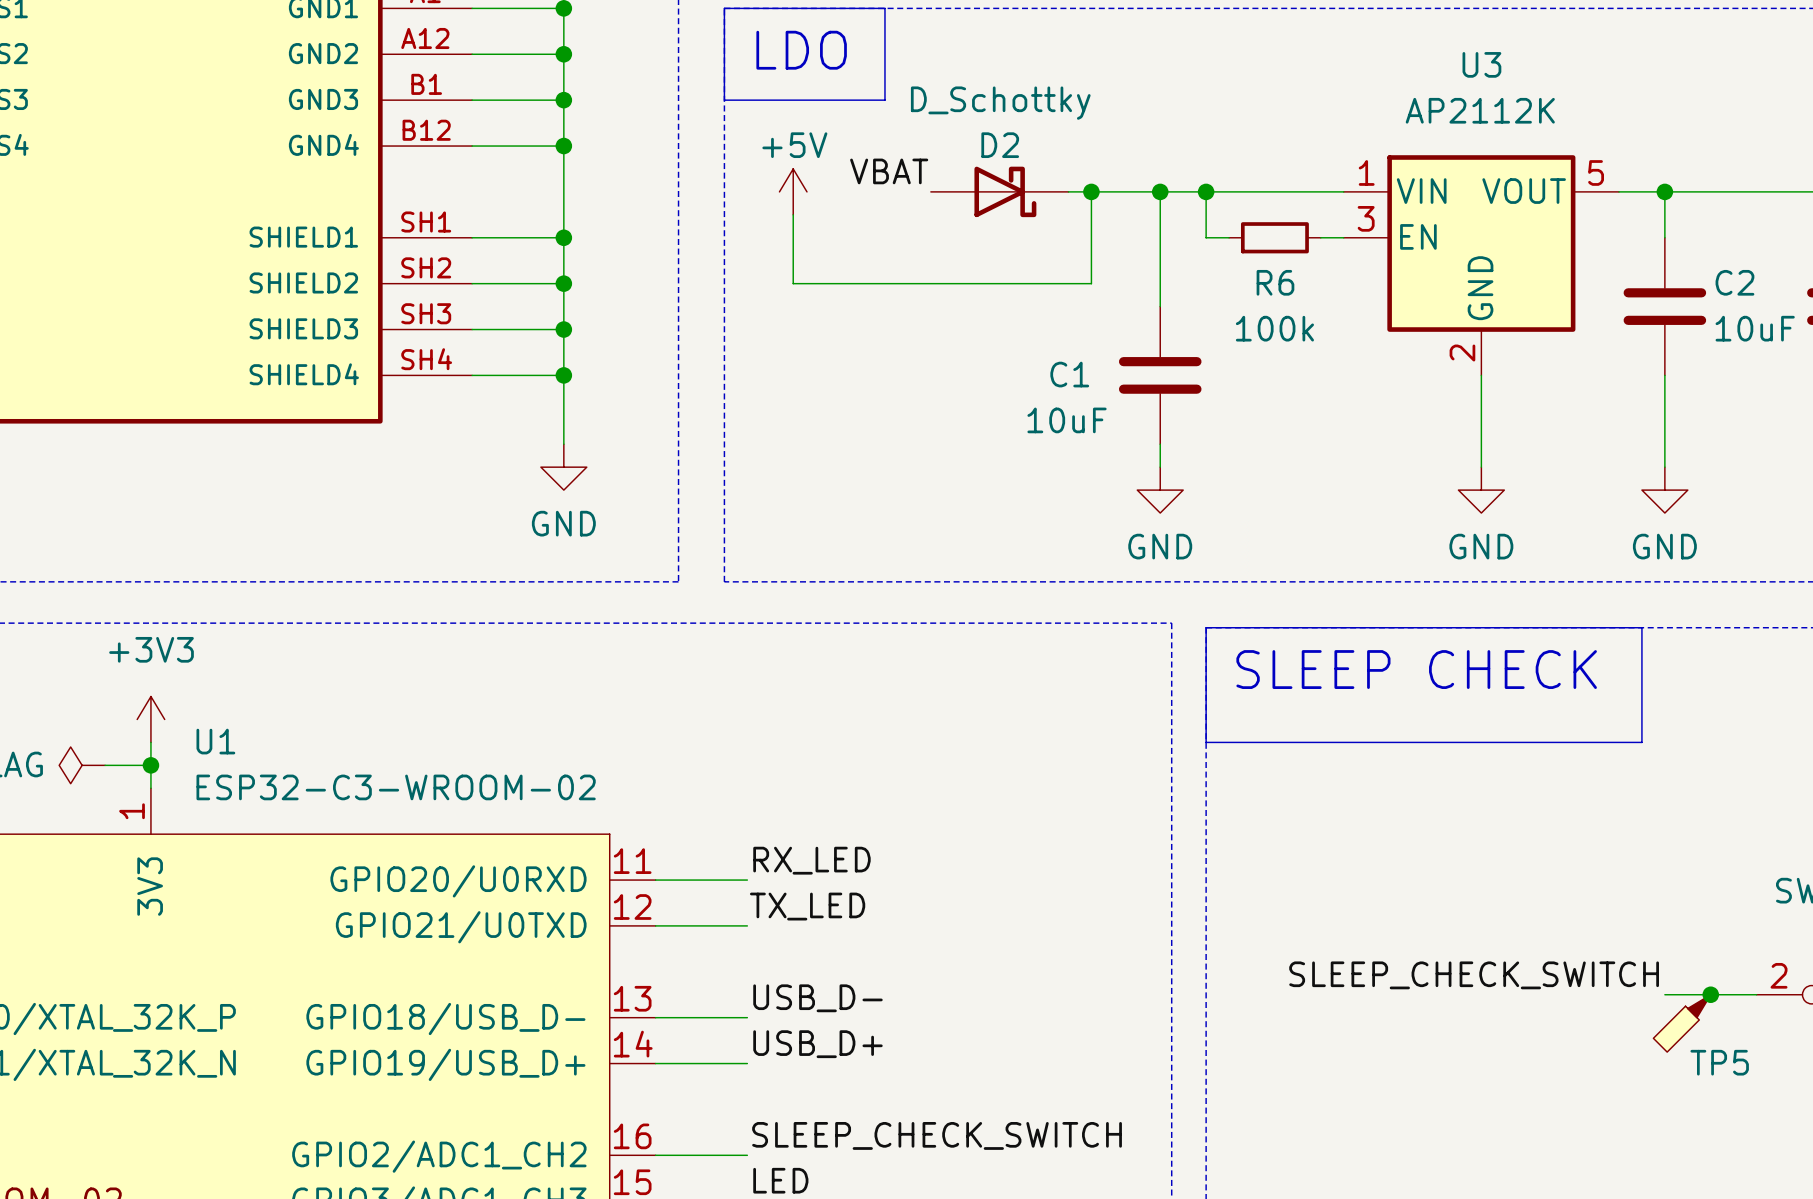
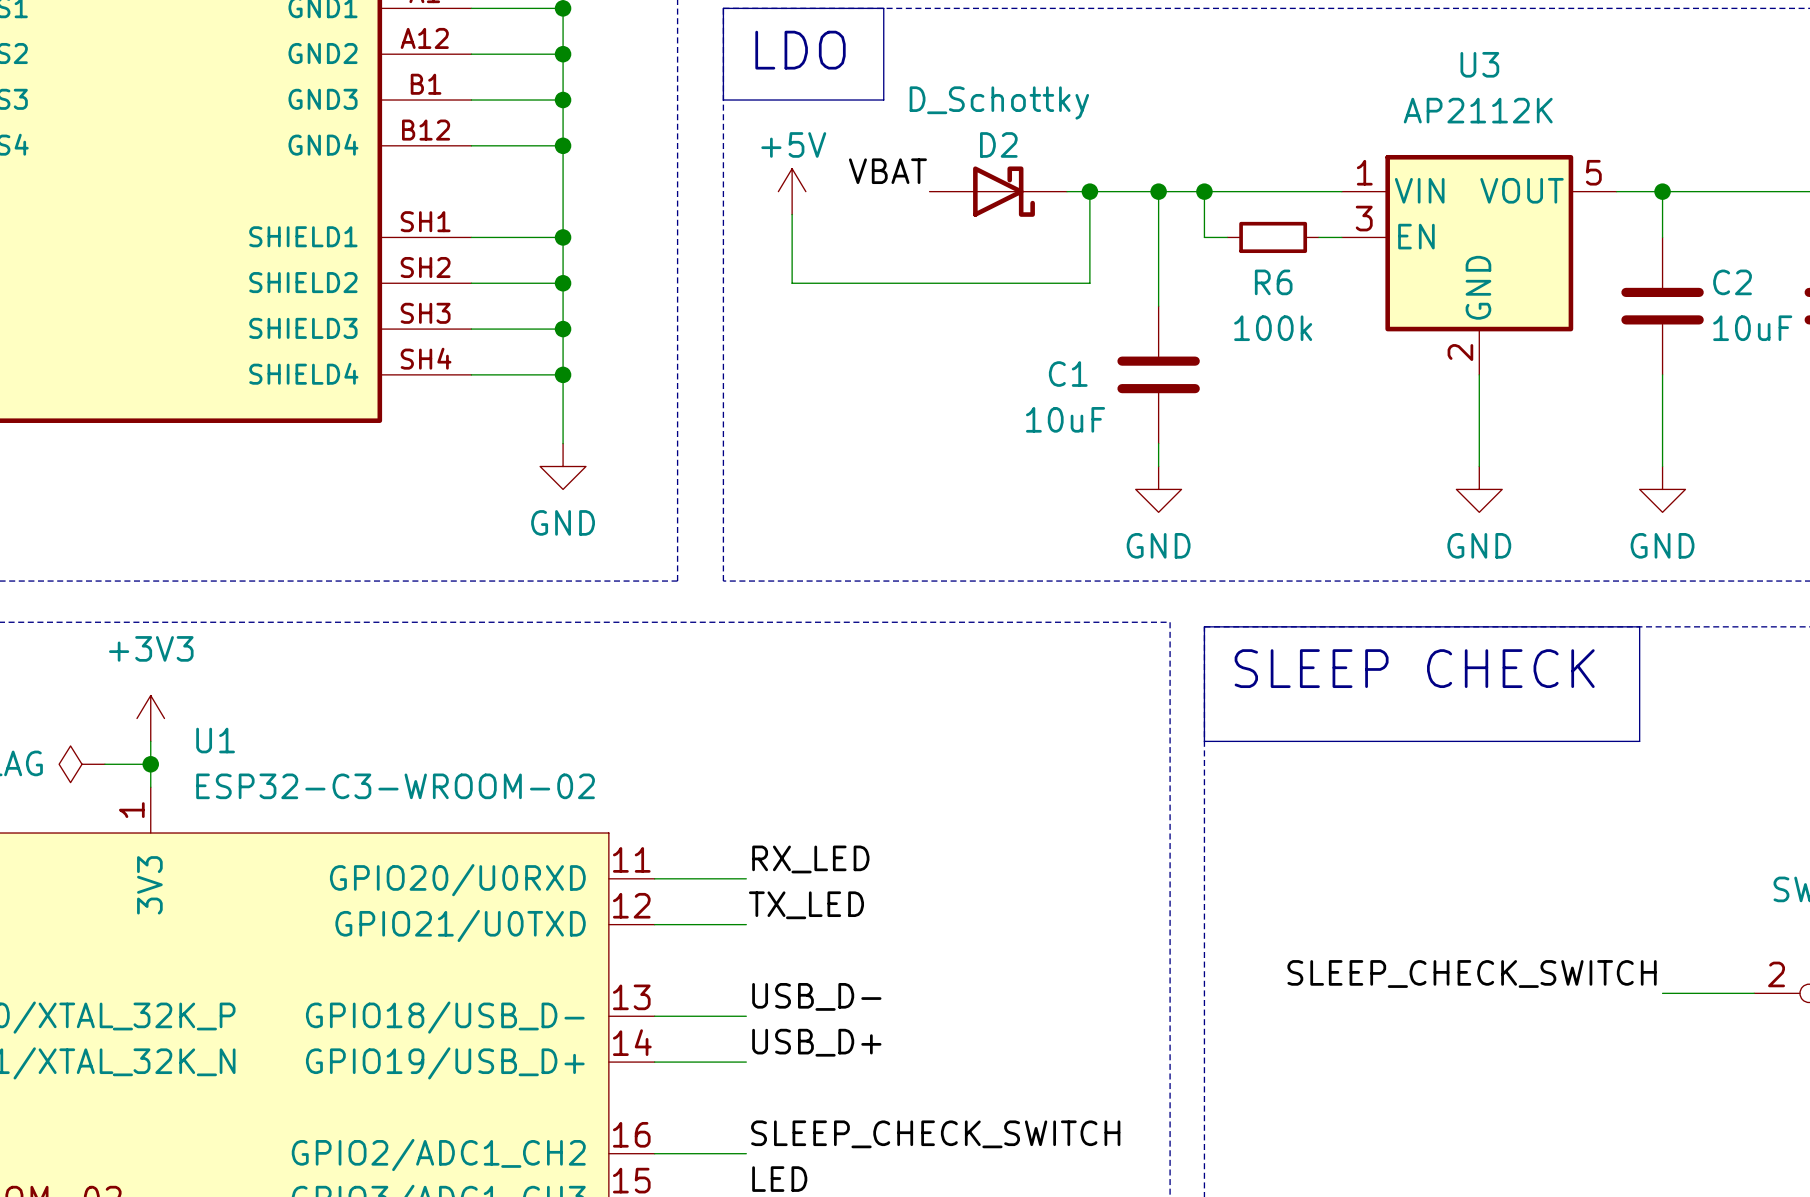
junction: (1710, 994) -> none
TP5: (1682, 1023) -> none

